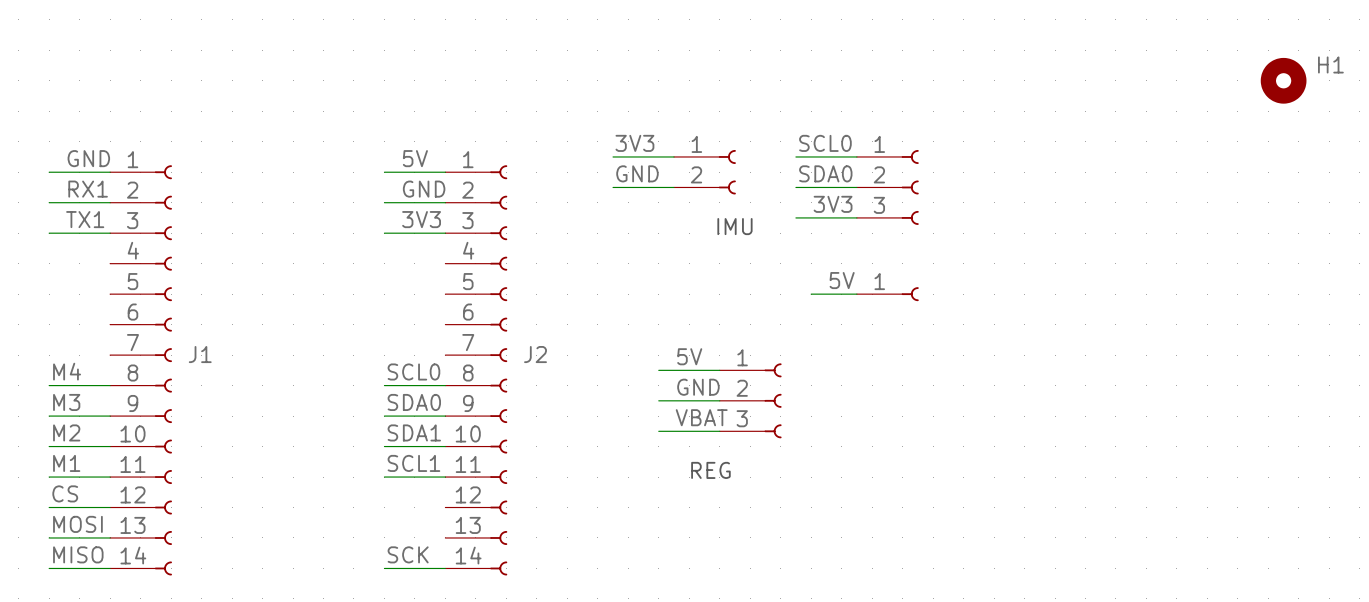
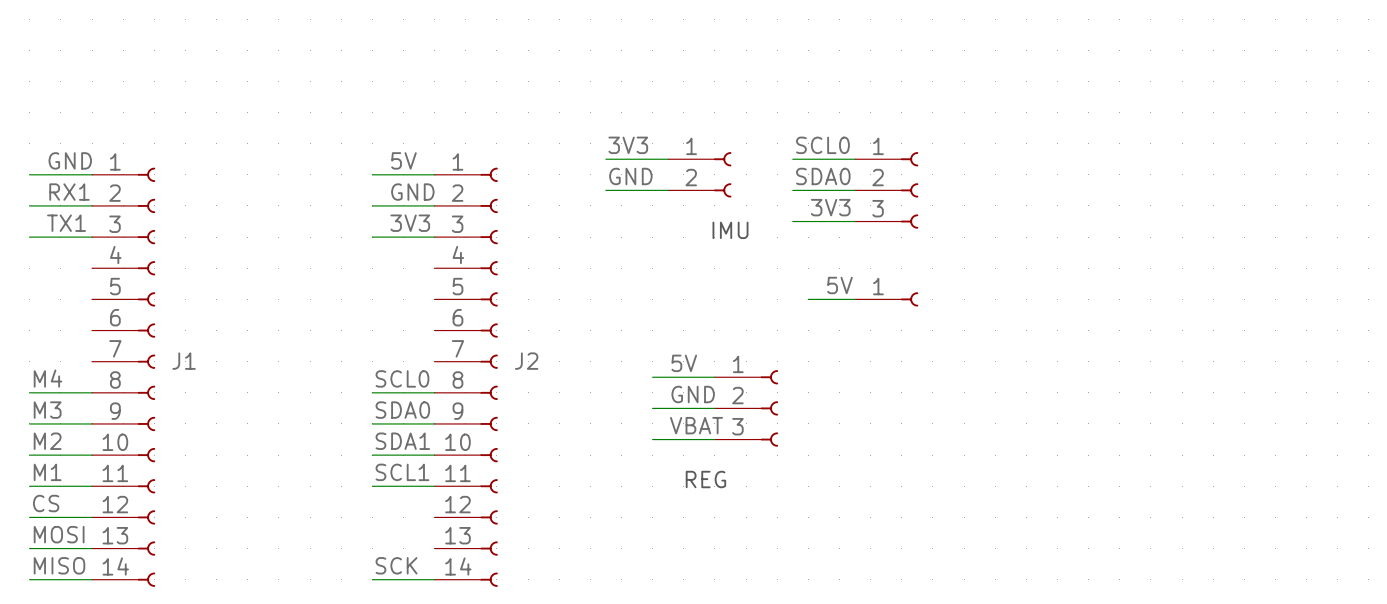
H1: (1283, 80) -> none

